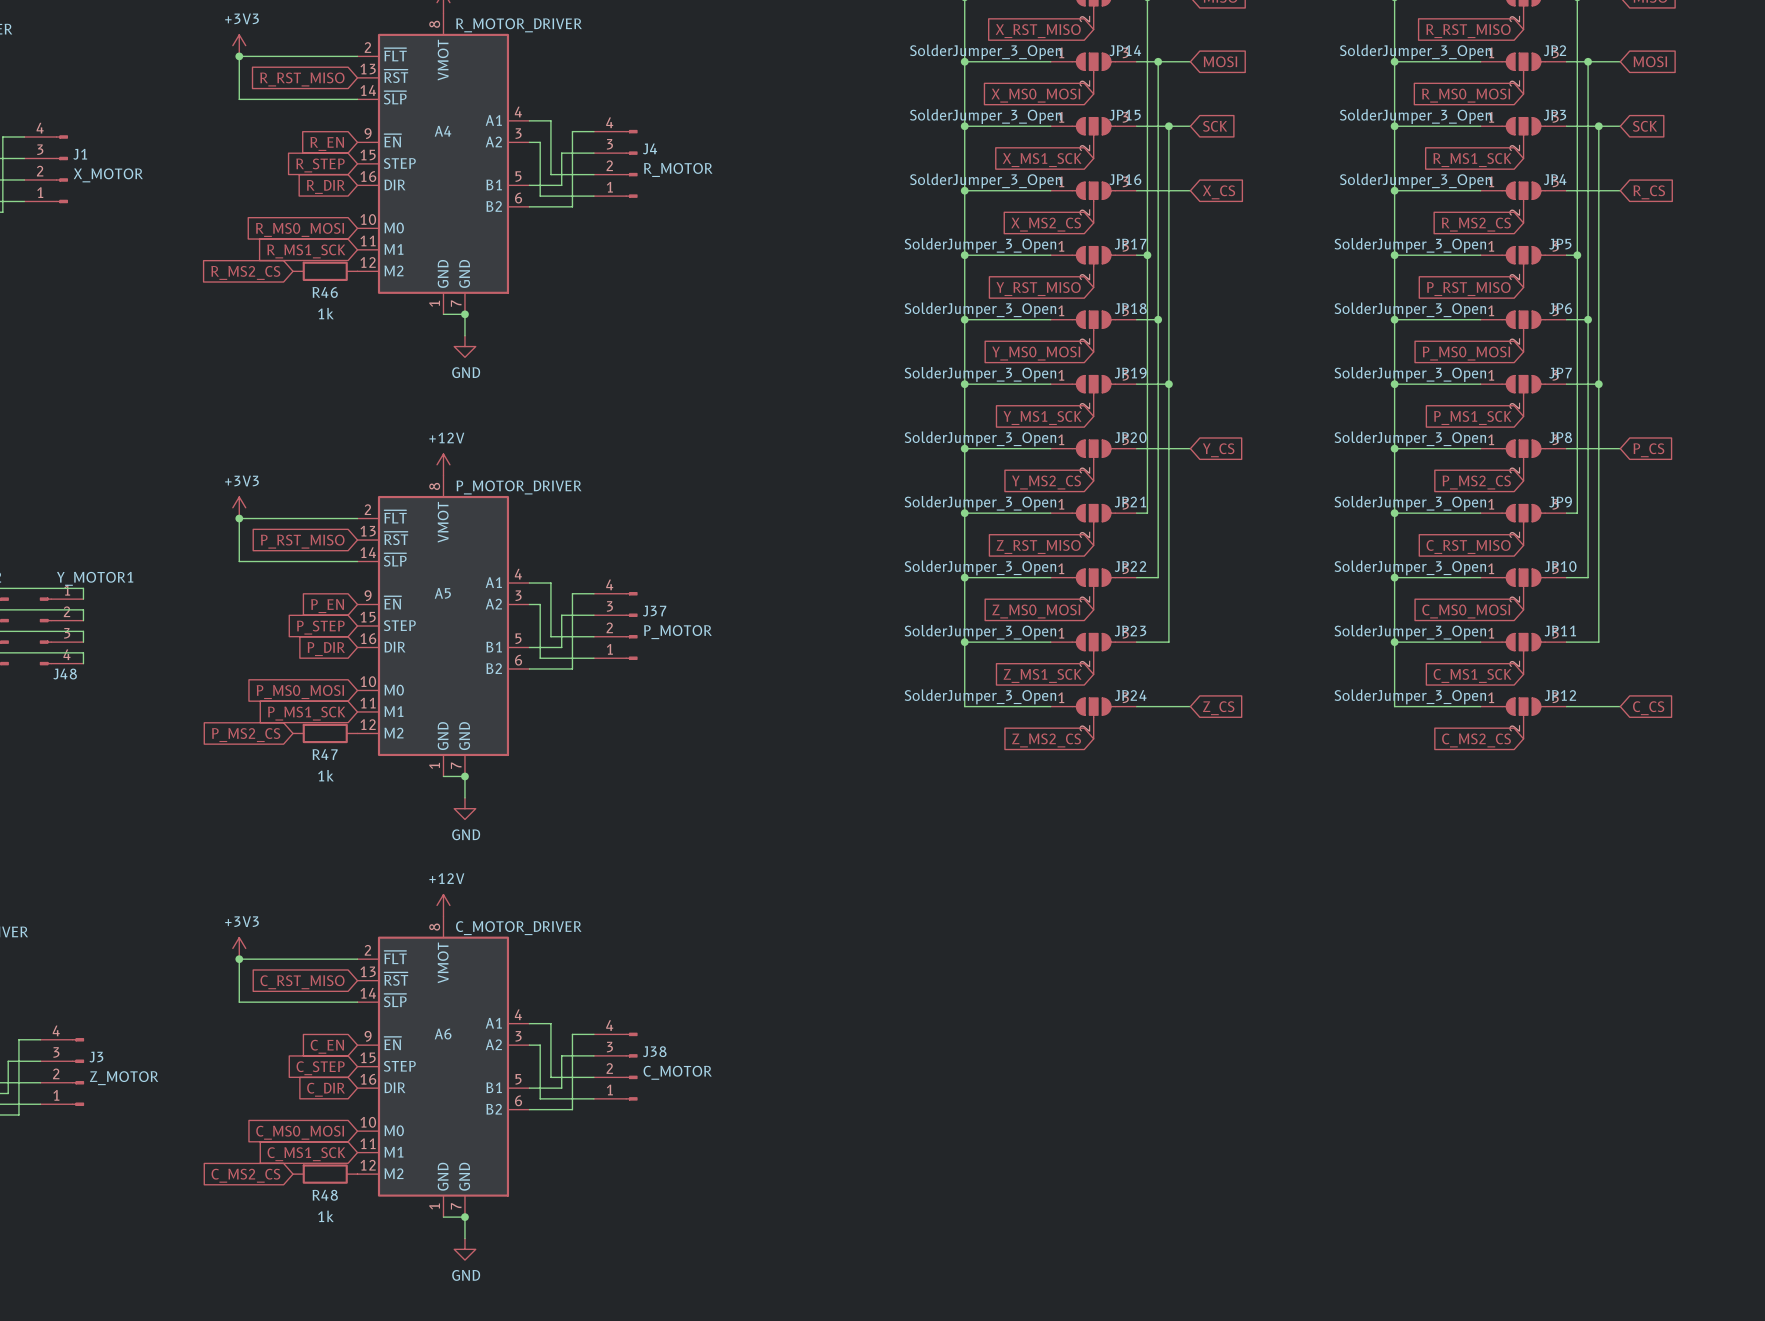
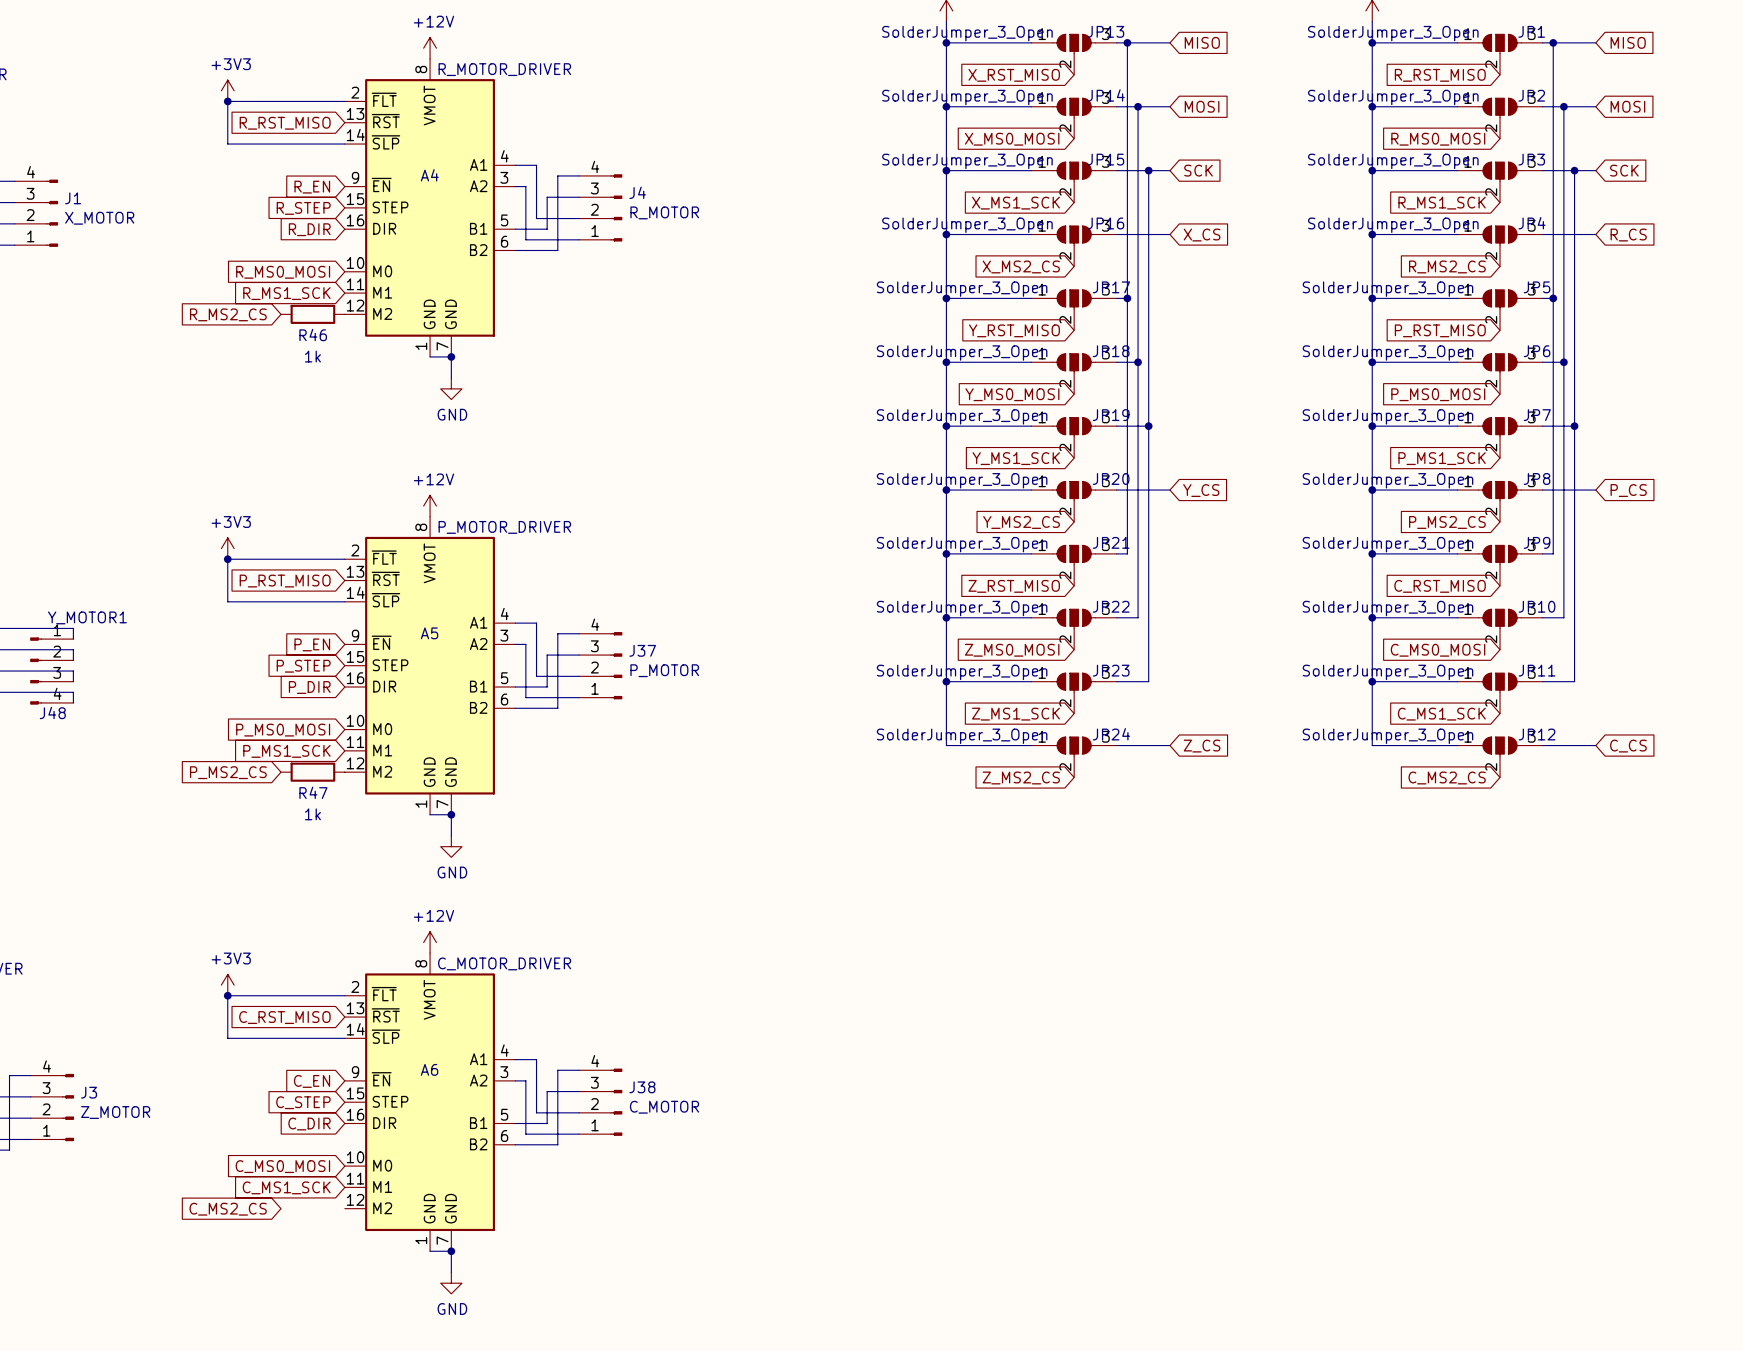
R48: 1k (325, 1174) -> none

